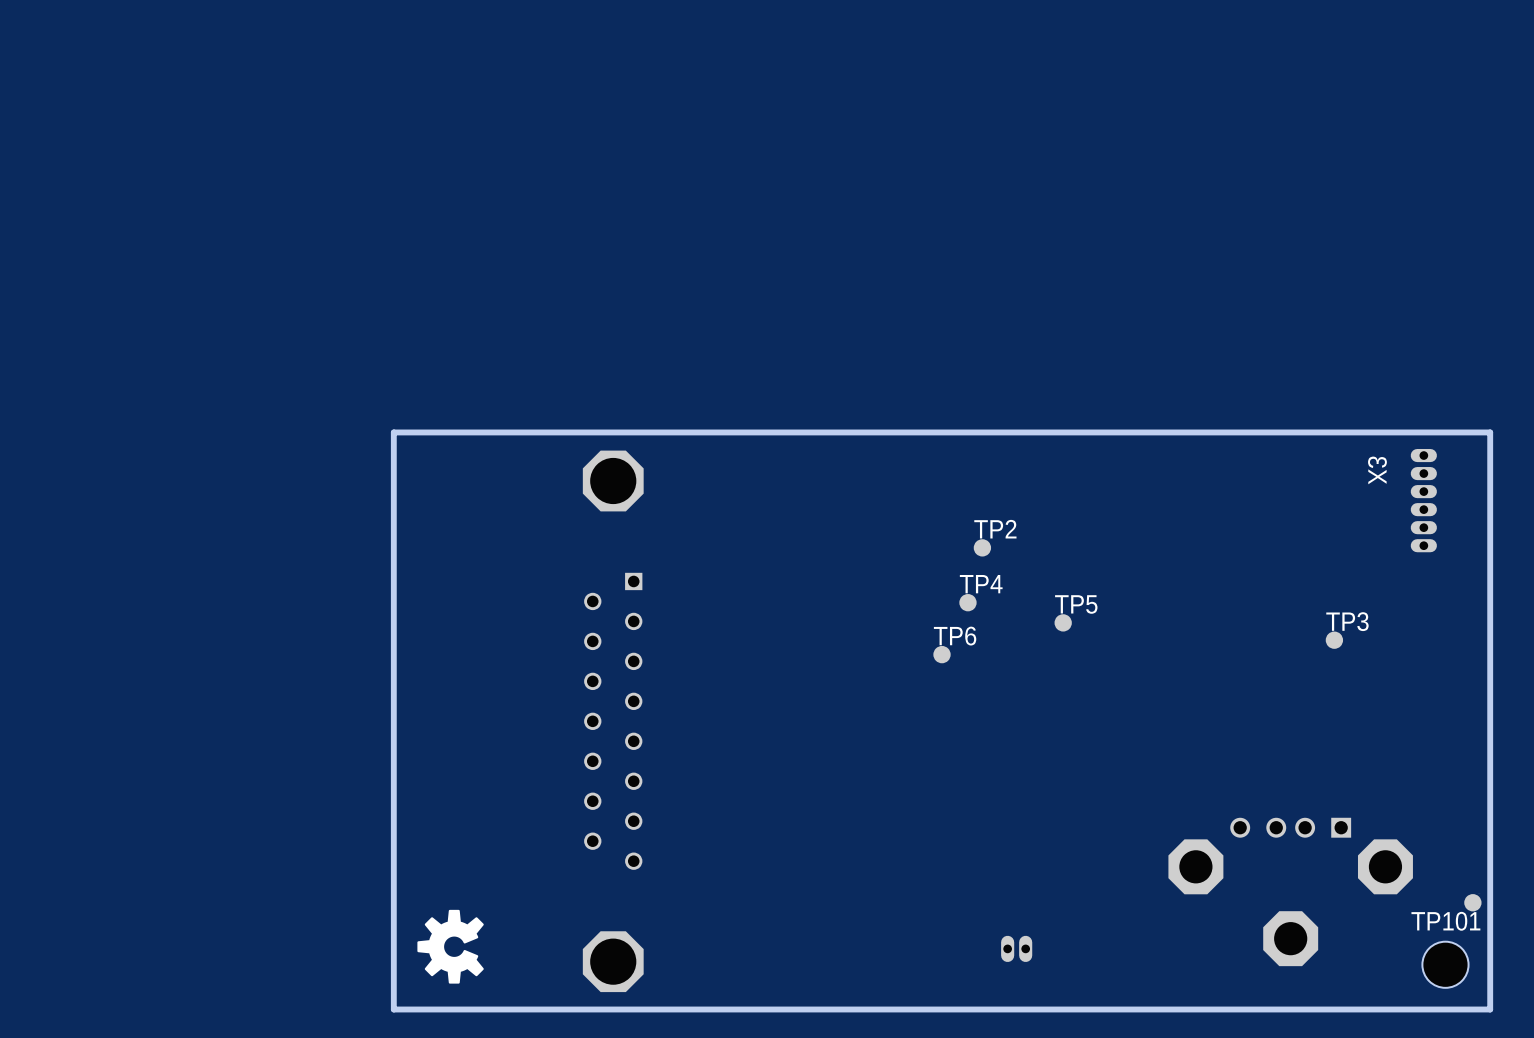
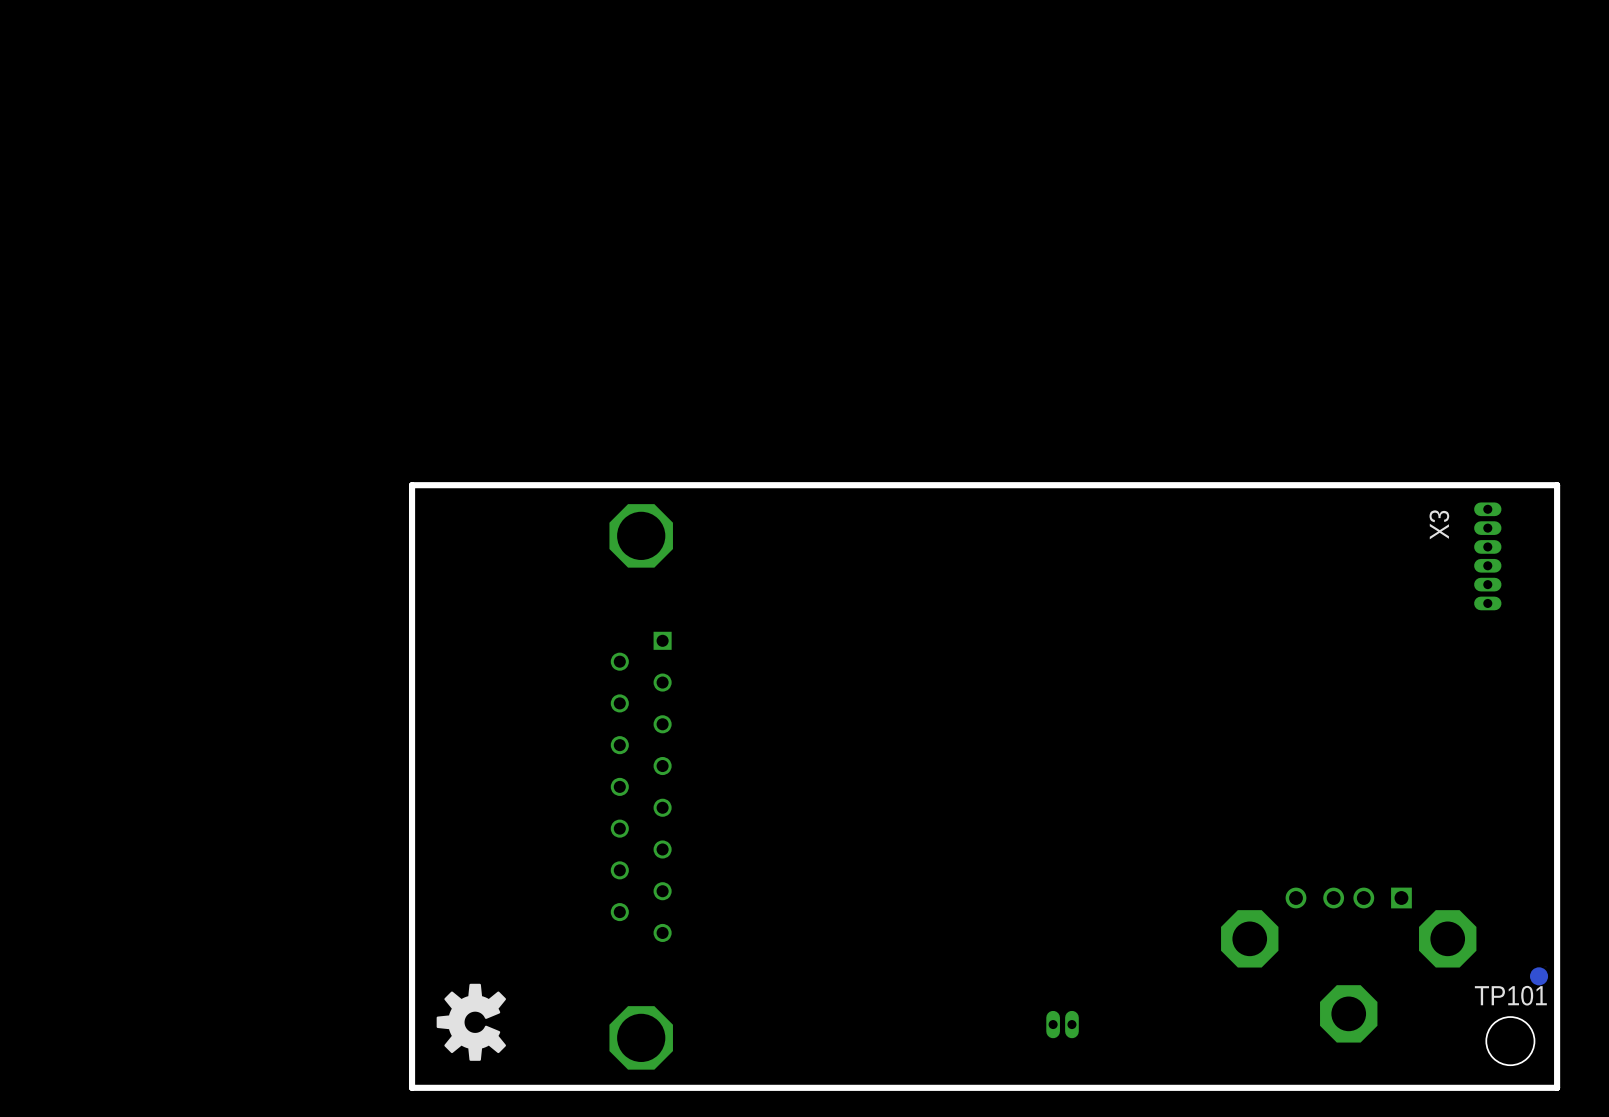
TP2: (982, 547) -> none
TP4: (967, 602) -> none
TP5: (1063, 622) -> none
TP3: (1334, 640) -> none
TP6: (942, 654) -> none

